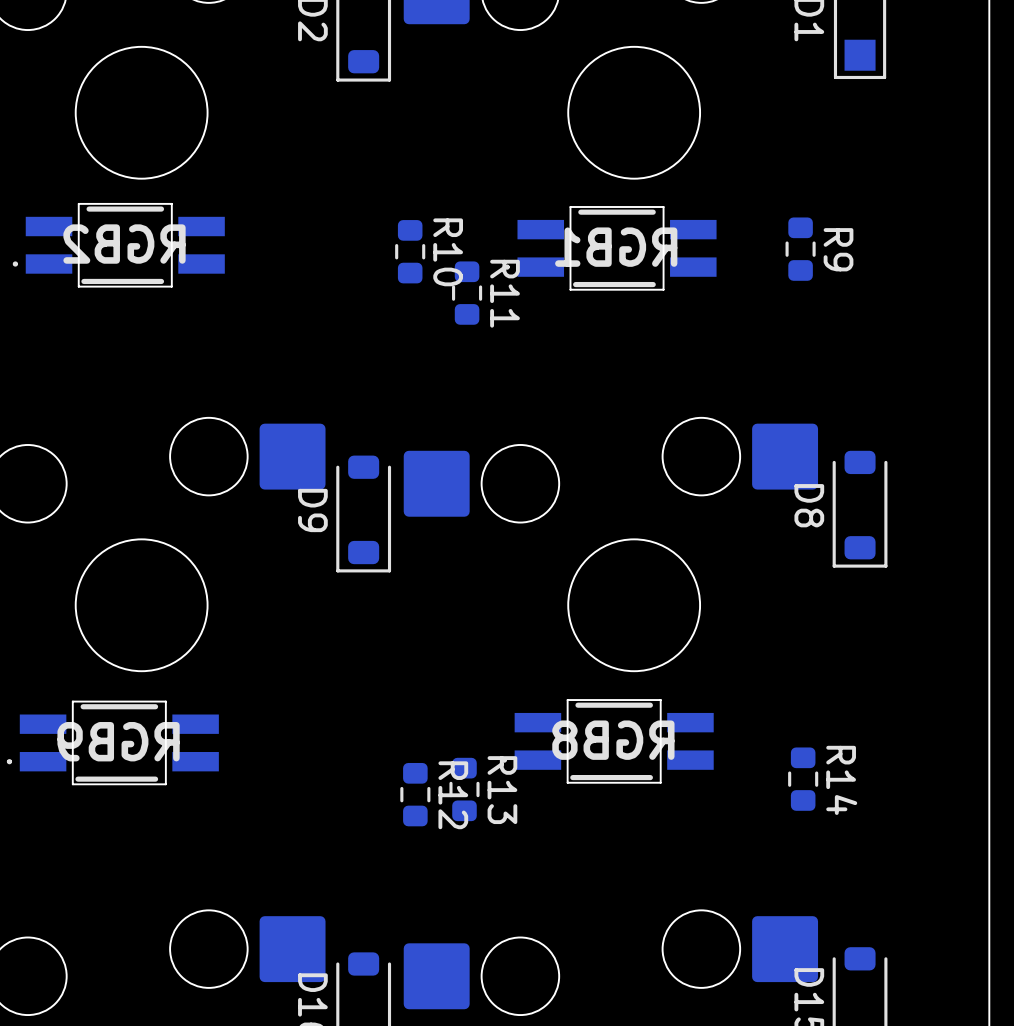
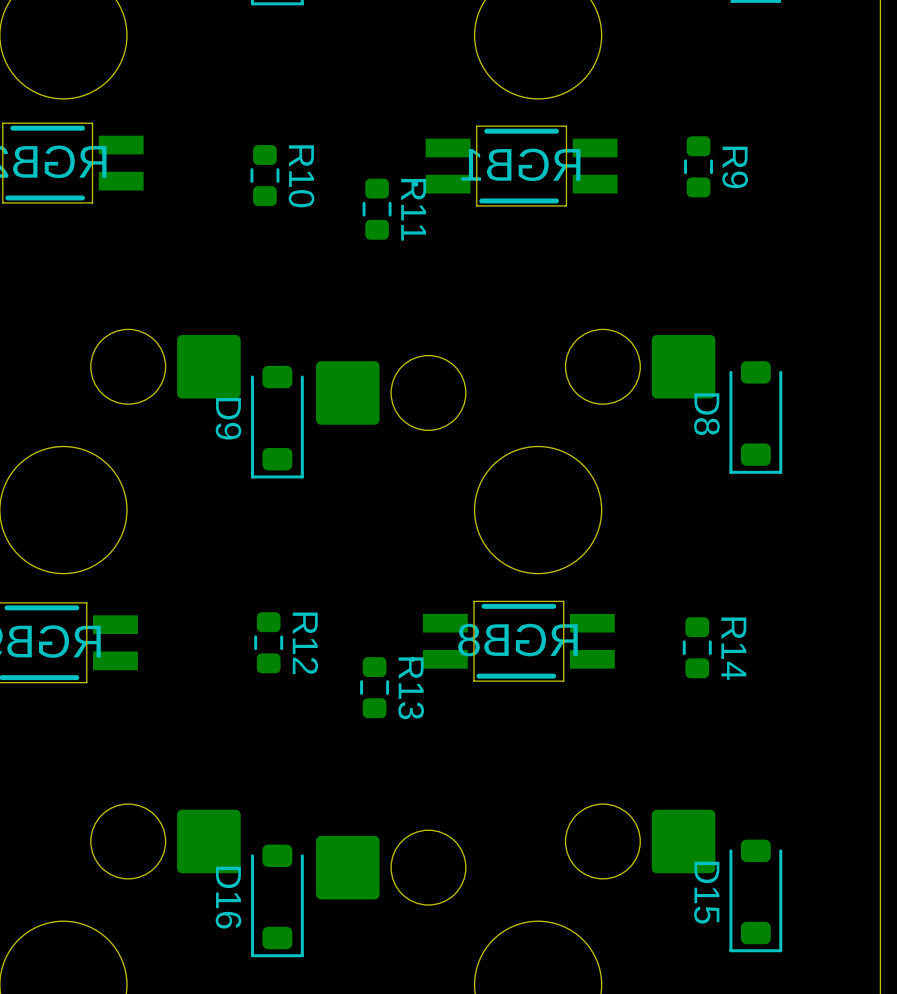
R10 position: (410, 251) -> (264, 175)
R14 position: (803, 779) -> (697, 647)
R12 position: (415, 794) -> (268, 642)

